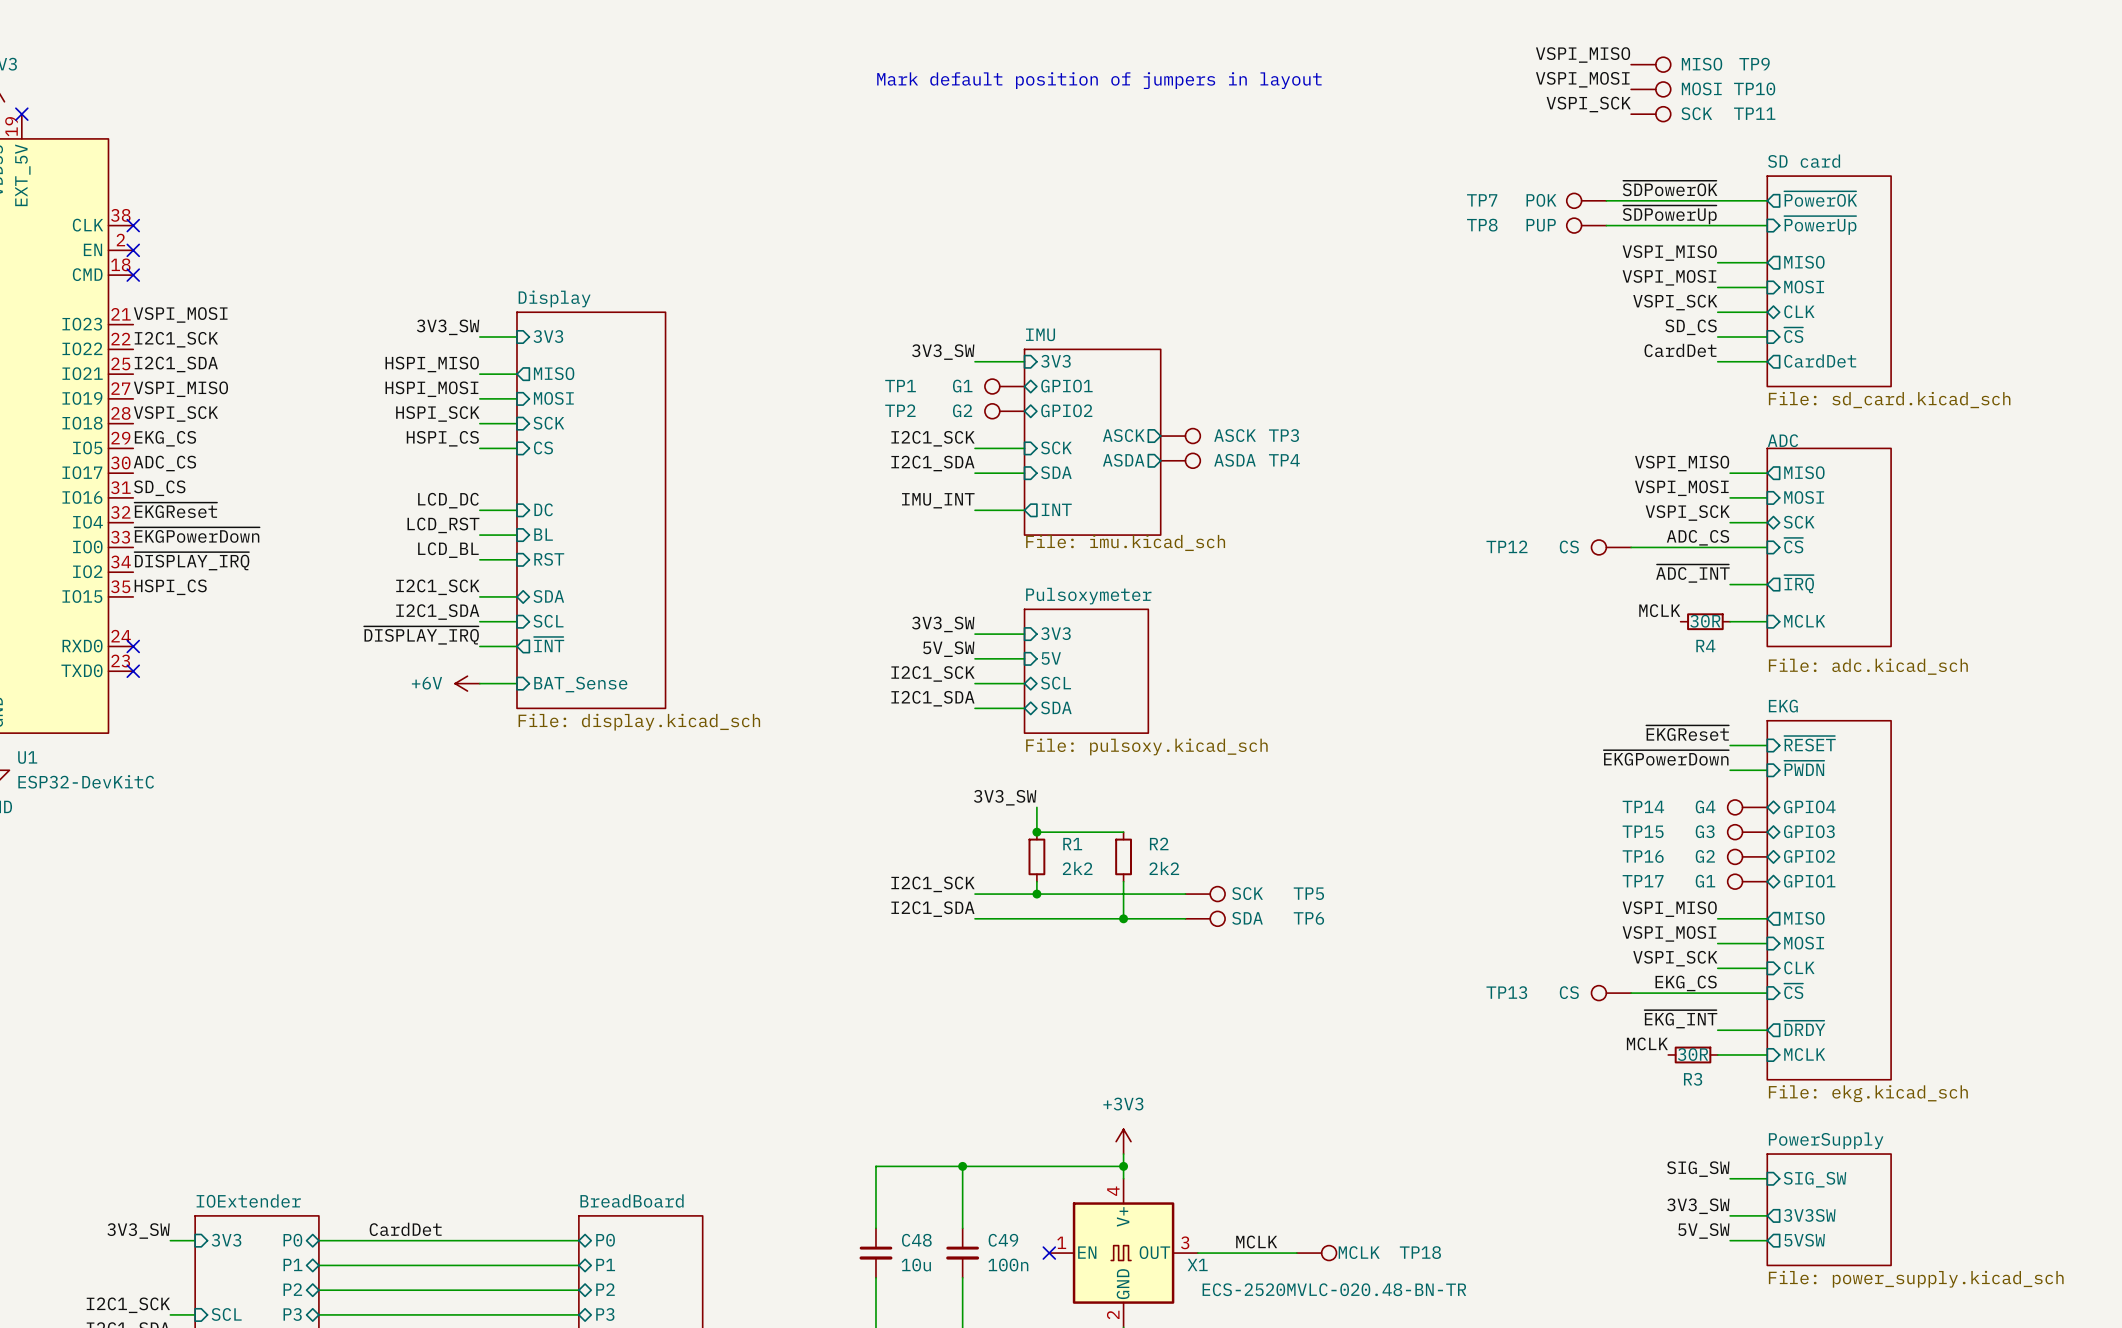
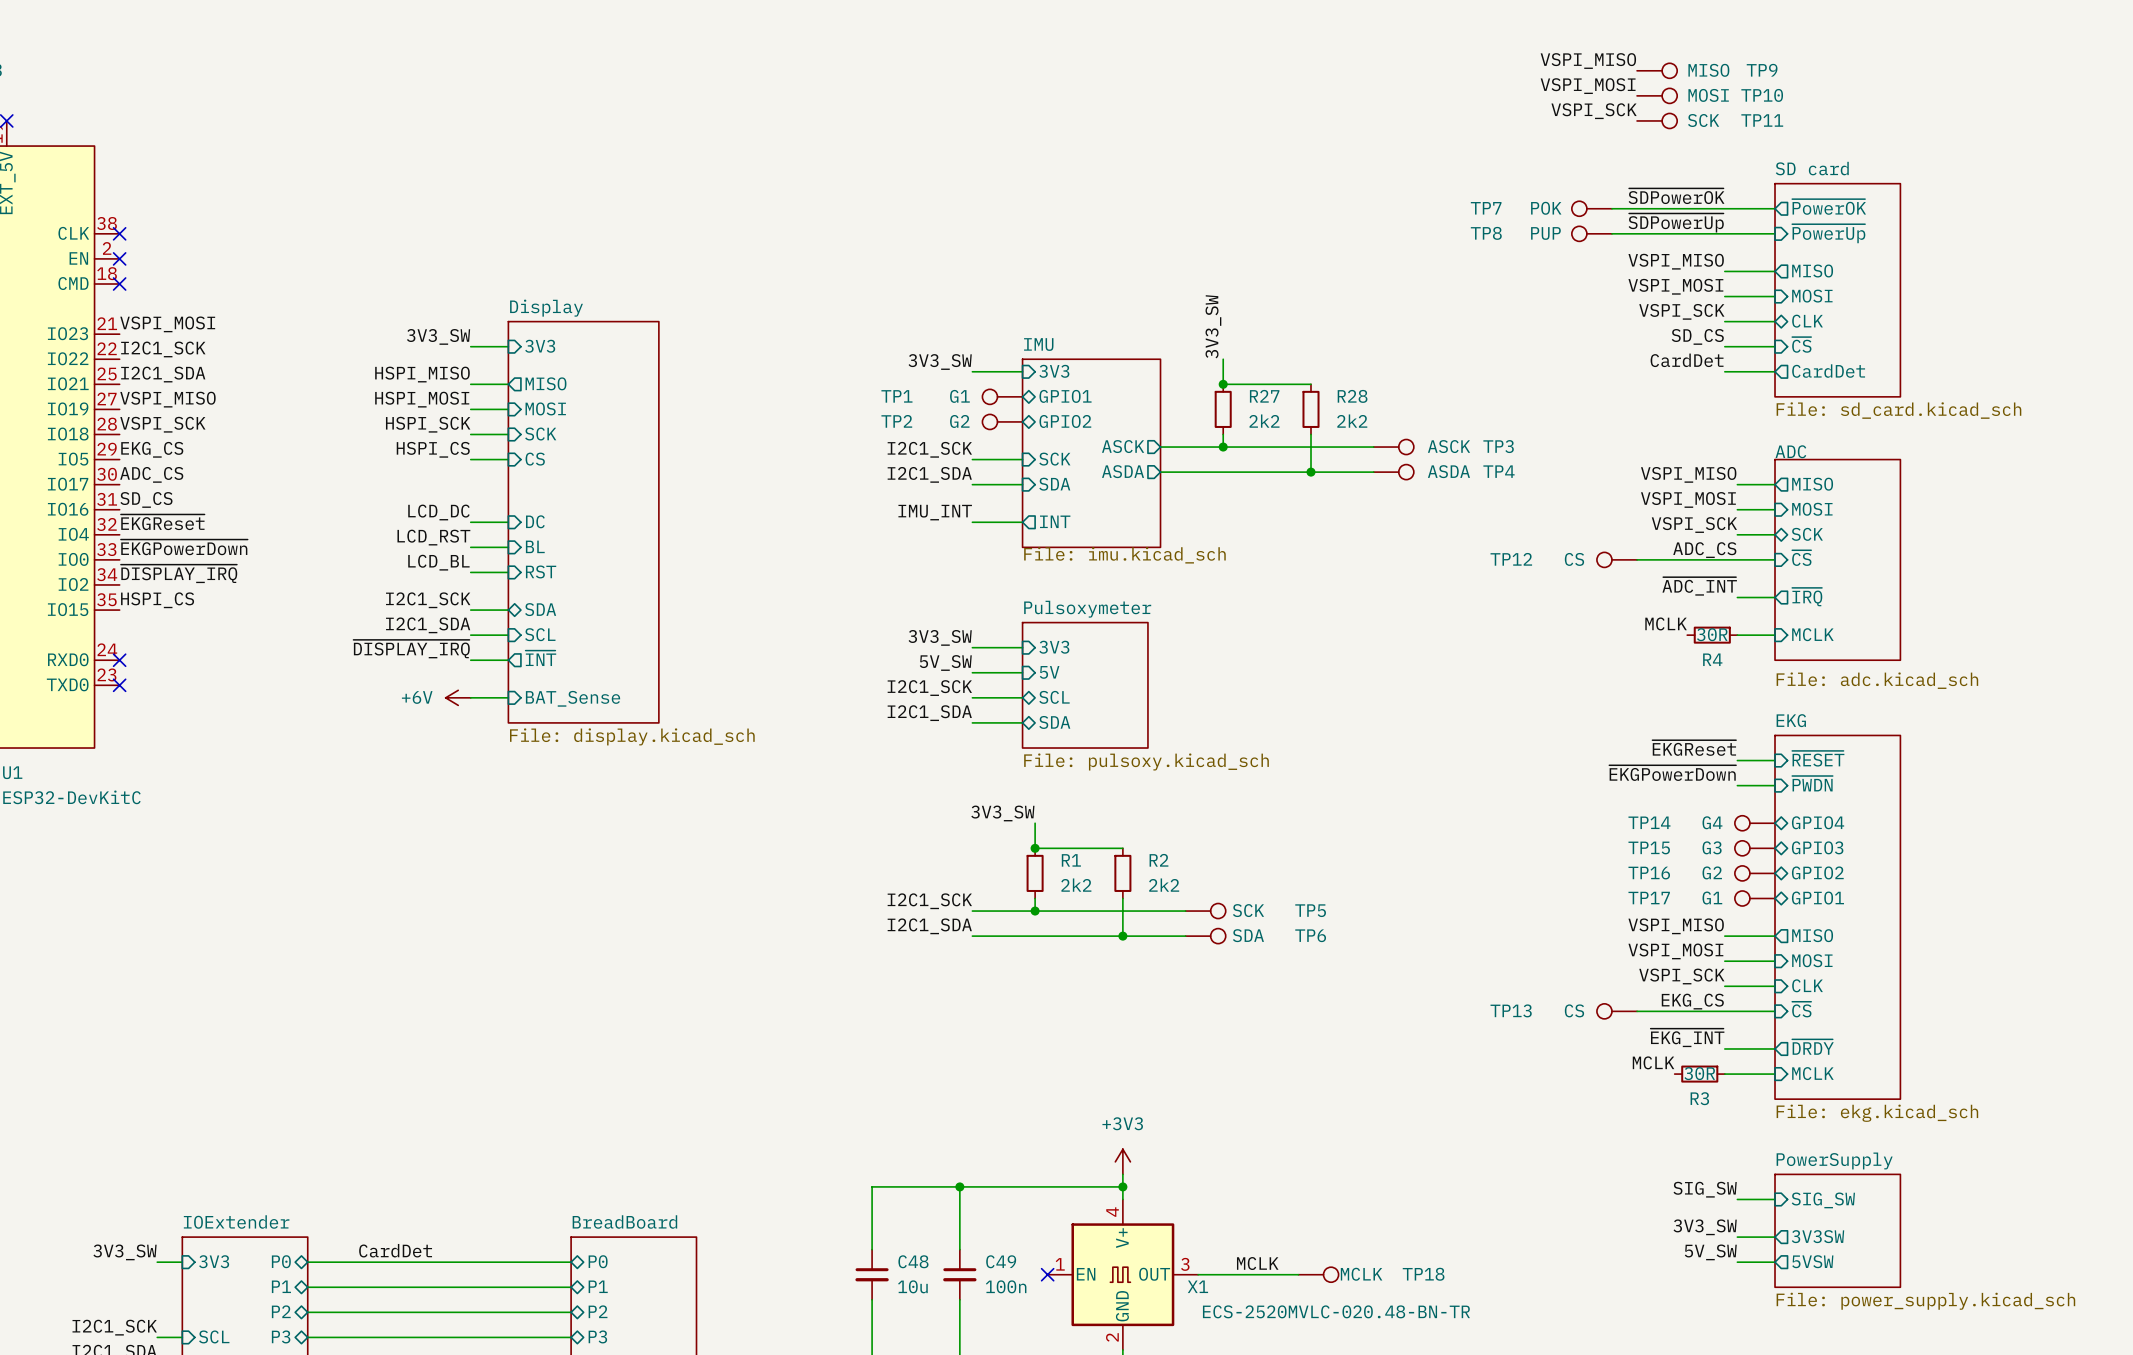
text: Mark default position of jumpers in layout (1099, 80) -> none
label: none -> 3V3_SW (1213, 326)
wire: none -> (1223, 359) (1223, 384) (1310, 384)
junction: none -> (1223, 384)
R27: none -> 2k2 (1223, 409)
R28: none -> 2k2 (1310, 409)
wire: none -> (1223, 434) (1223, 447)
wire: none -> (1310, 434) (1310, 472)
wire: none -> (1160, 447) (1373, 447)
TP3 position: (1180, 436) -> (1393, 447)
junction: none -> (1223, 447)
wire: none -> (1160, 472) (1373, 472)
TP4 position: (1180, 460) -> (1393, 472)
junction: none -> (1310, 472)

